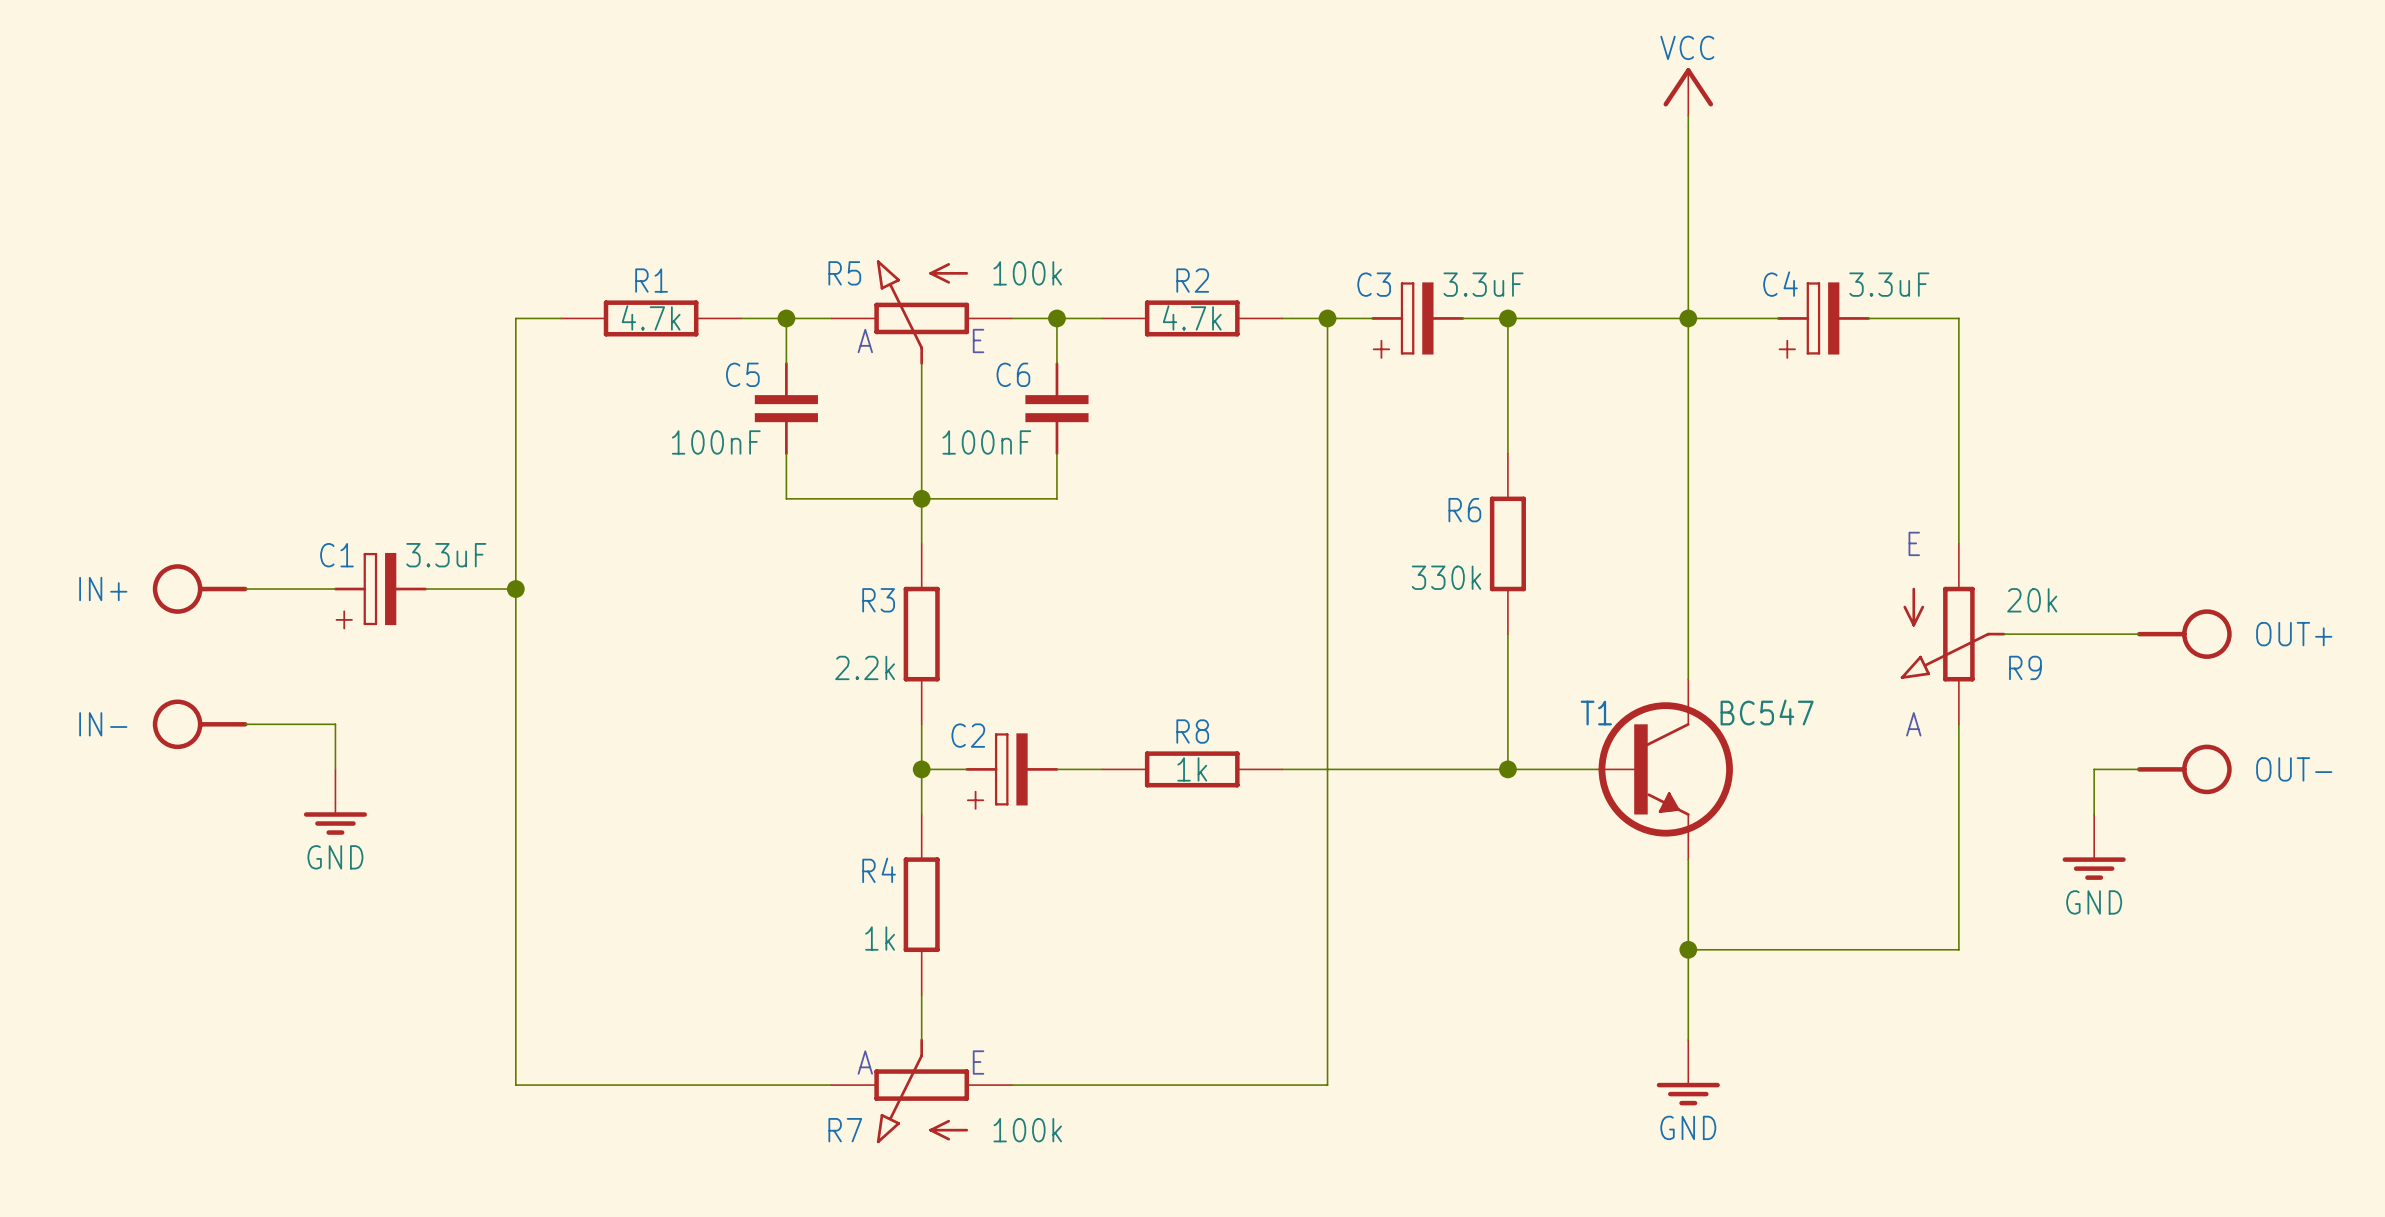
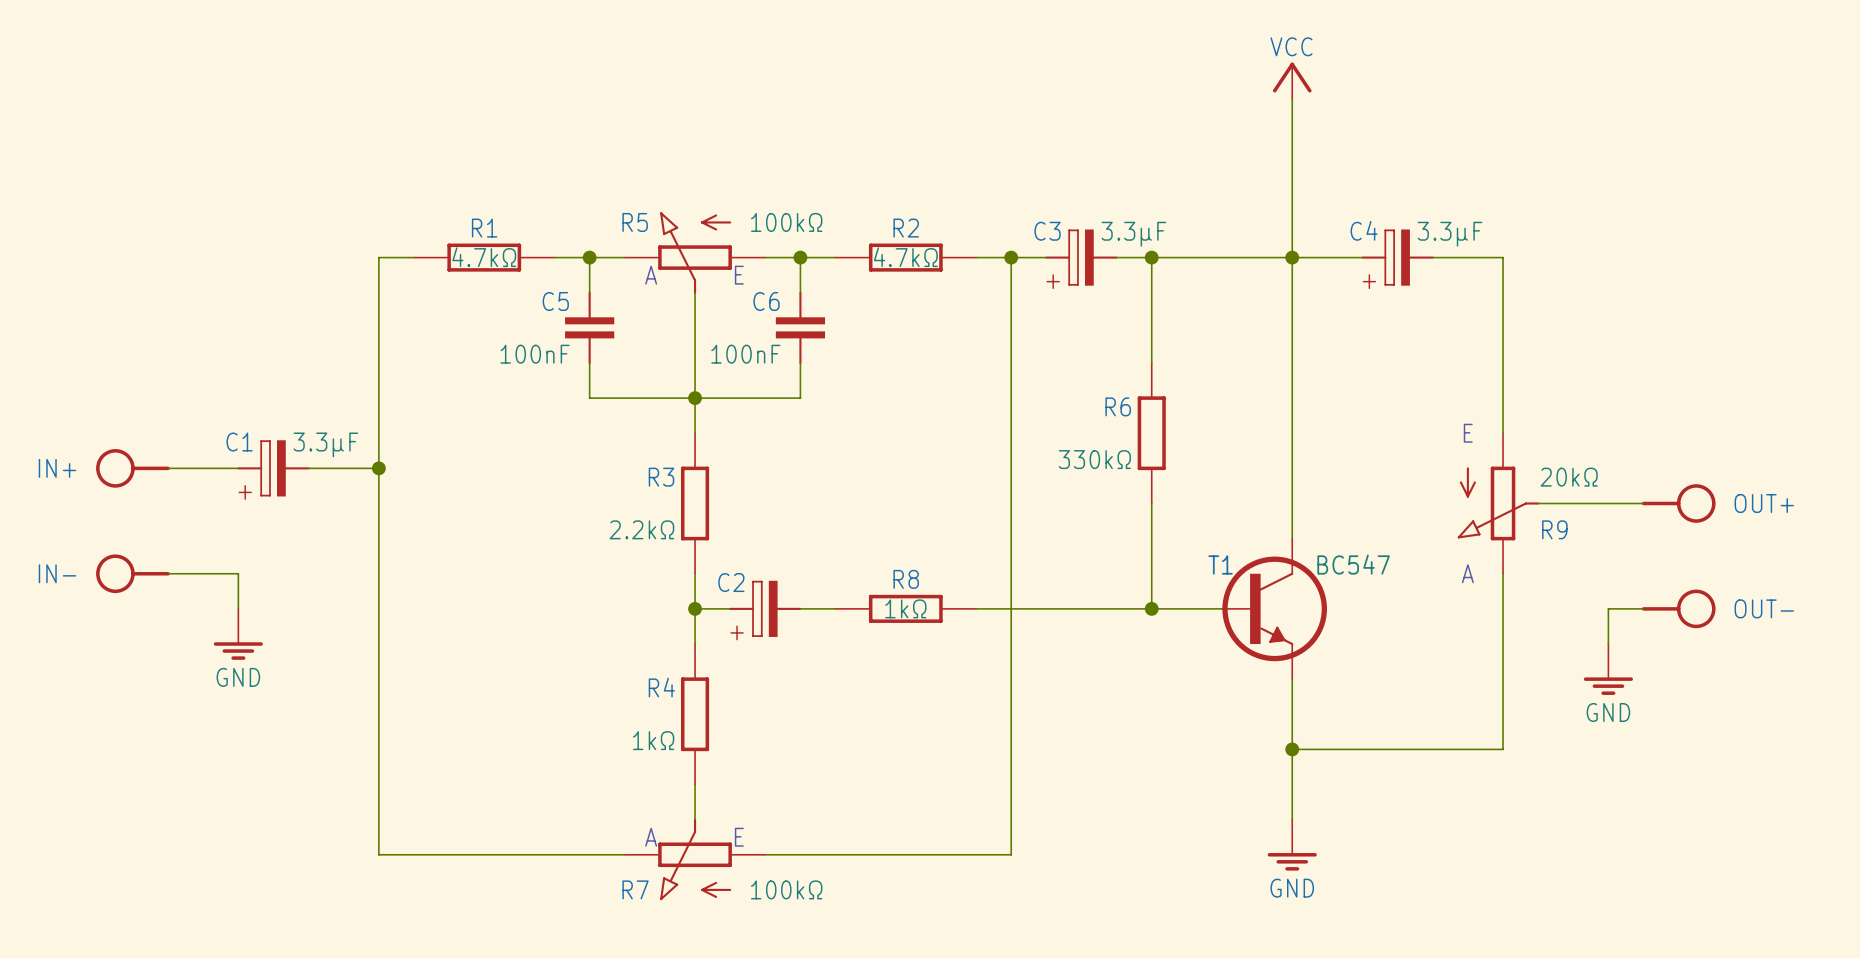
R5 value: 100k (1027, 273) -> 100kΩ (786, 222)
C3 value: 3.3uF (1483, 284) -> 3.3μF (1133, 234)
C4 value: 3.3uF (1889, 284) -> 3.3μF (1449, 234)
R1 value: 4.7k (651, 317) -> 4.7kΩ (484, 257)
R2 value: 4.7k (1192, 317) -> 4.7kΩ (905, 257)
C1 value: 3.3uF (446, 555) -> 3.3μF (325, 444)
R6 value: 330k (1446, 577) -> 330kΩ (1094, 459)
R9 value: 20k (2032, 600) -> 20kΩ (1569, 477)
R3 value: 2.2k (865, 667) -> 2.2kΩ (641, 529)
R8 value: 1k (1192, 769) -> 1kΩ (905, 608)
R4 value: 1k (880, 938) -> 1kΩ (653, 740)
R7 value: 100k (1027, 1130) -> 100kΩ (786, 889)

